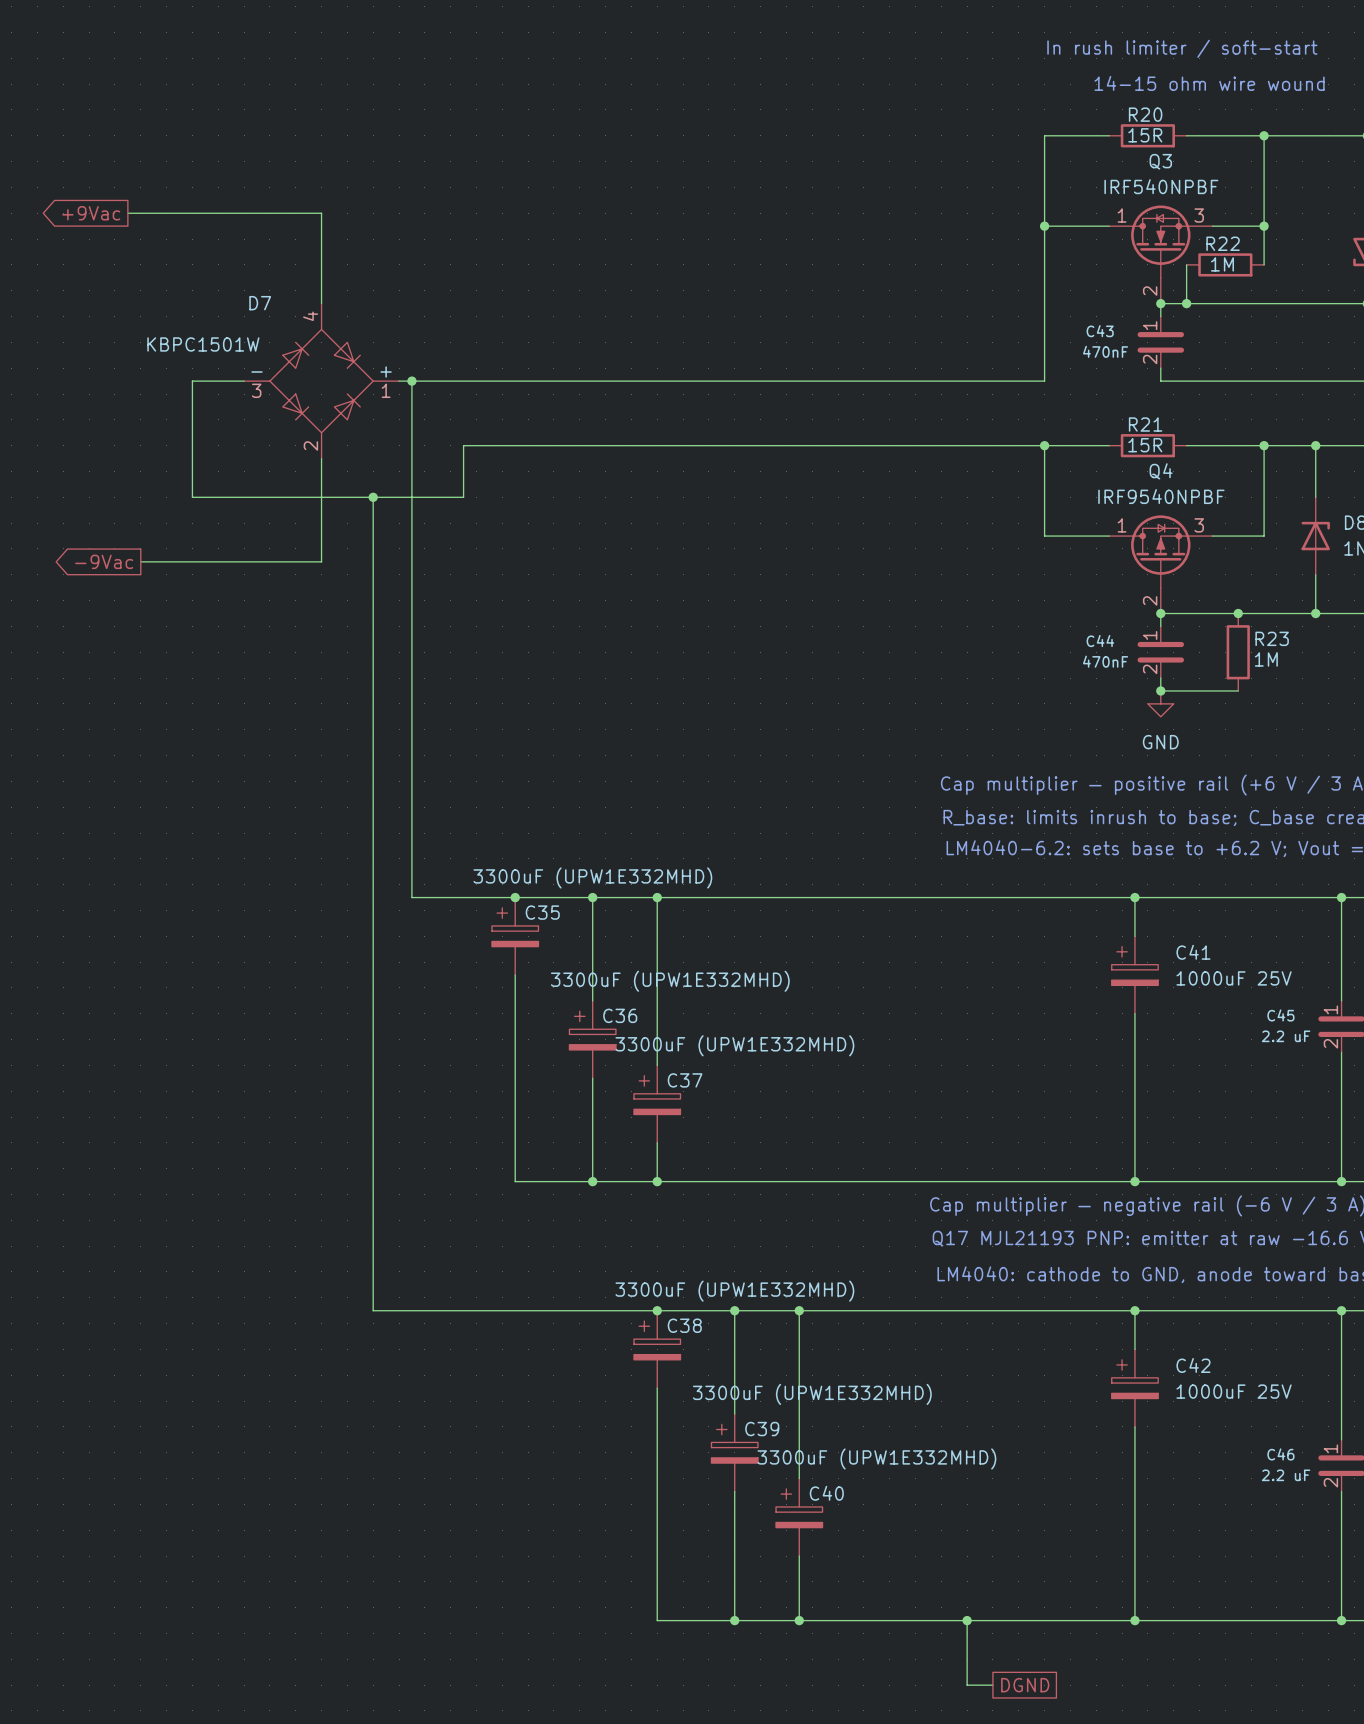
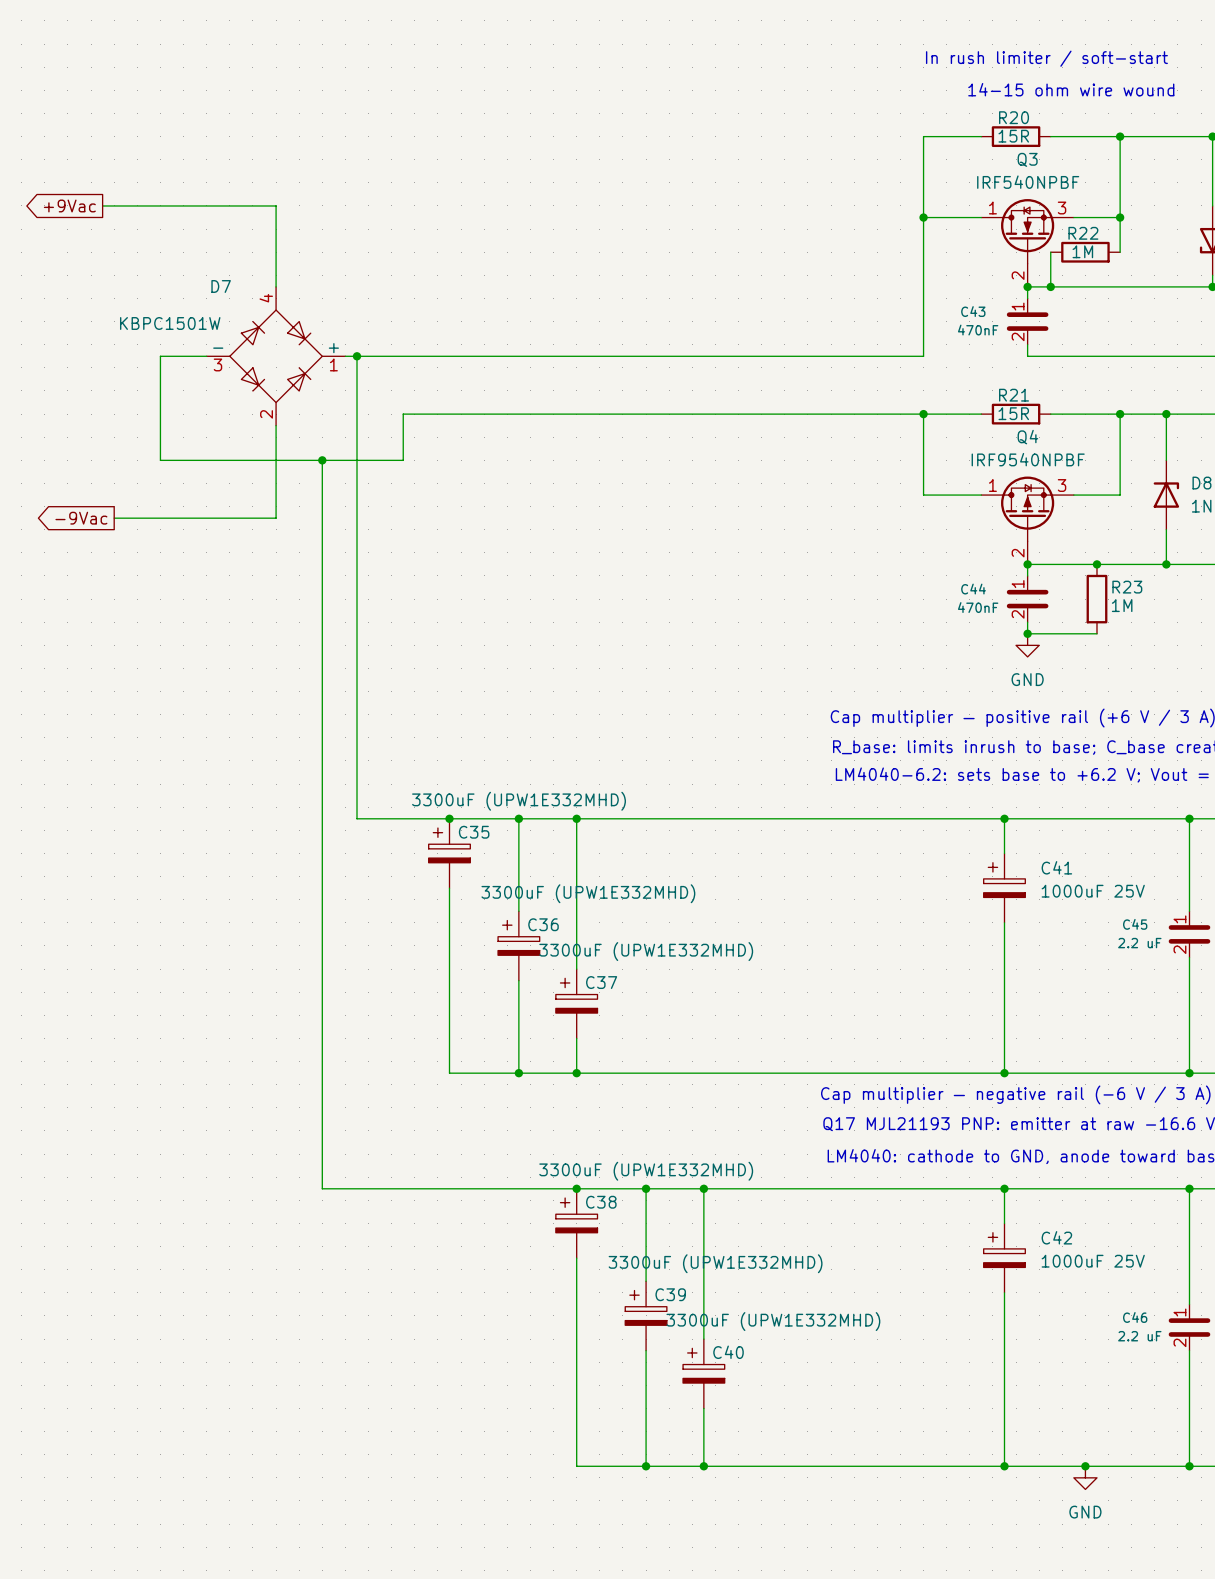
wire: (967, 1620) (967, 1685) (992, 1685) -> none
junction: (967, 1620) -> none
junction: none -> (1085, 1466)
power symbol: none -> GND (1085, 1477)
global label: DGND (1025, 1685) -> none

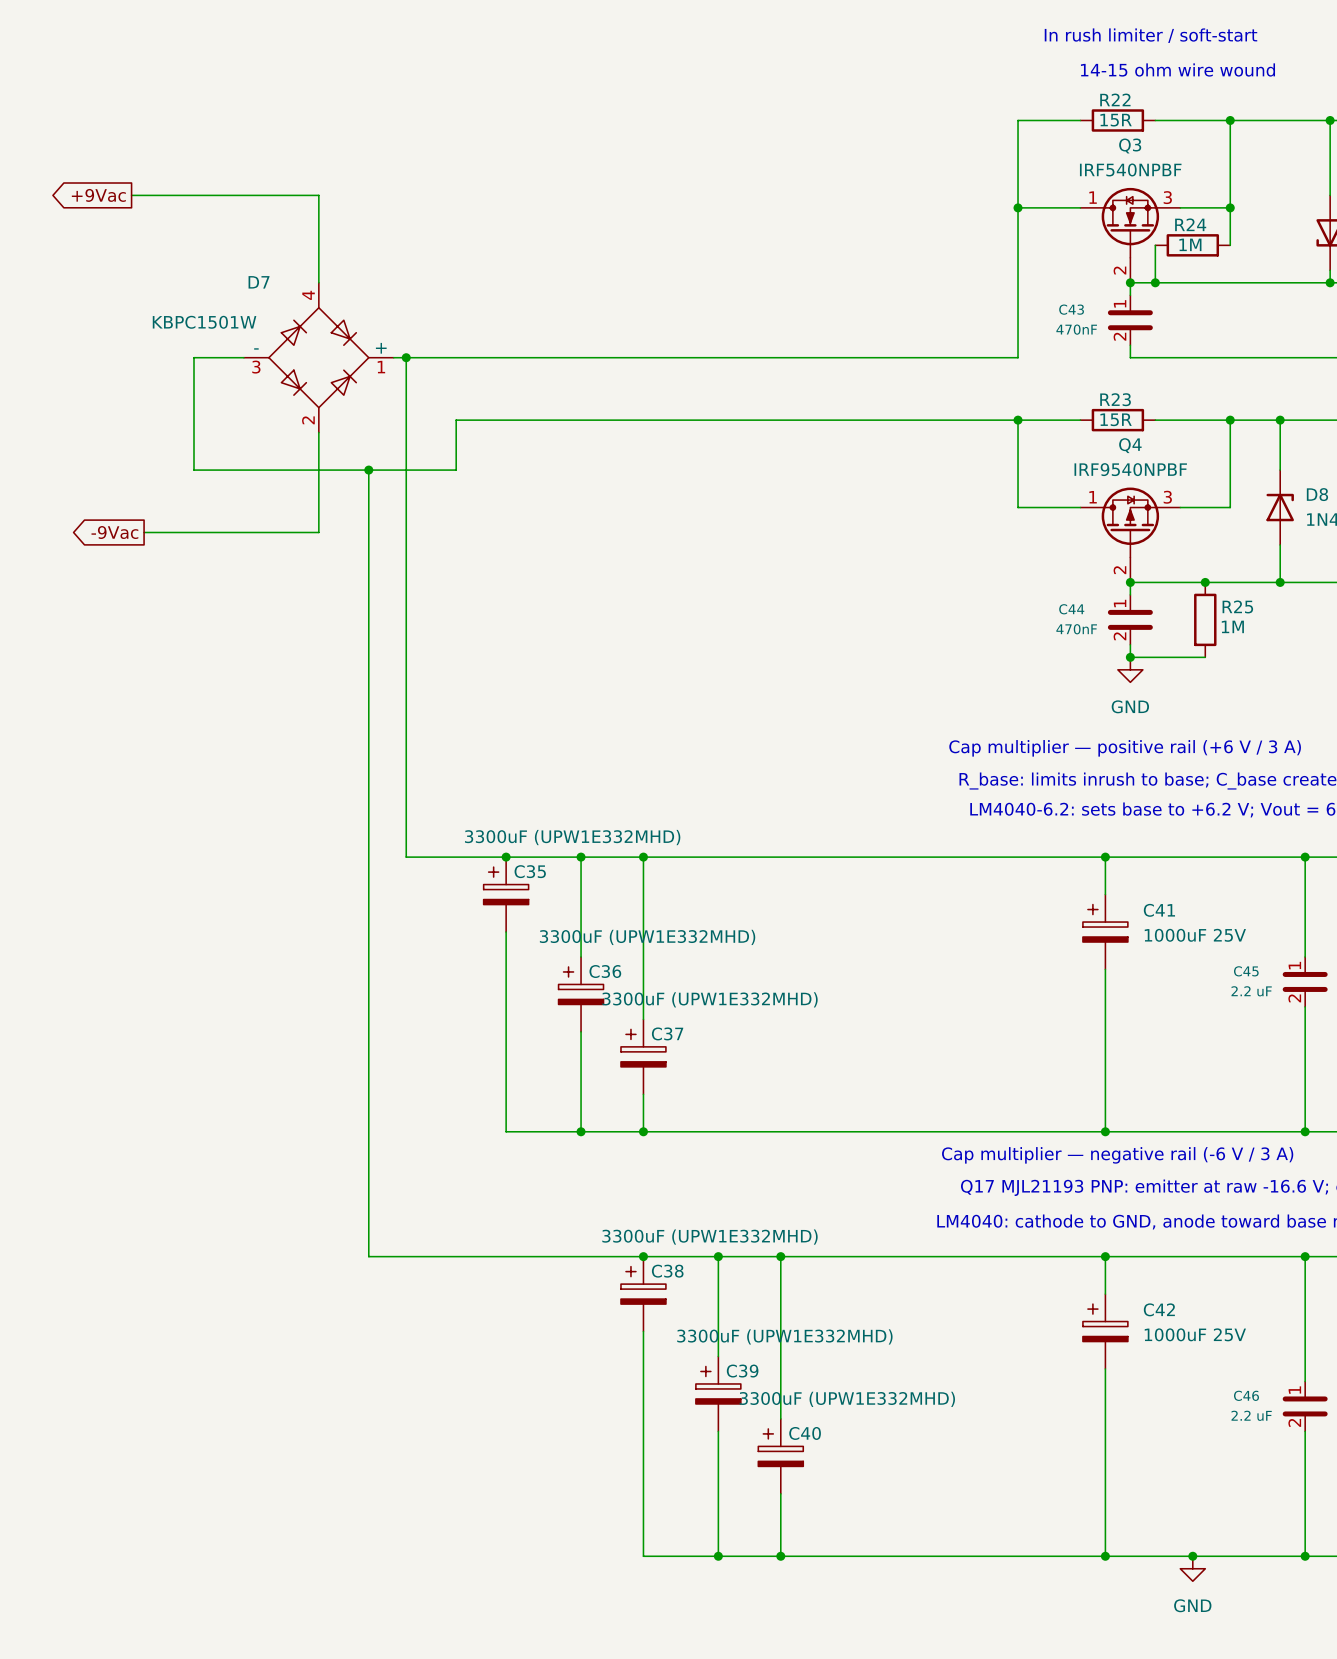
R20 name: R20 (1014, 117) -> R22 (1115, 99)
R22 name: R22 (1083, 233) -> R24 (1190, 224)
R21 name: R21 (1014, 395) -> R23 (1115, 399)
R23 name: R23 (1127, 587) -> R25 (1237, 606)

